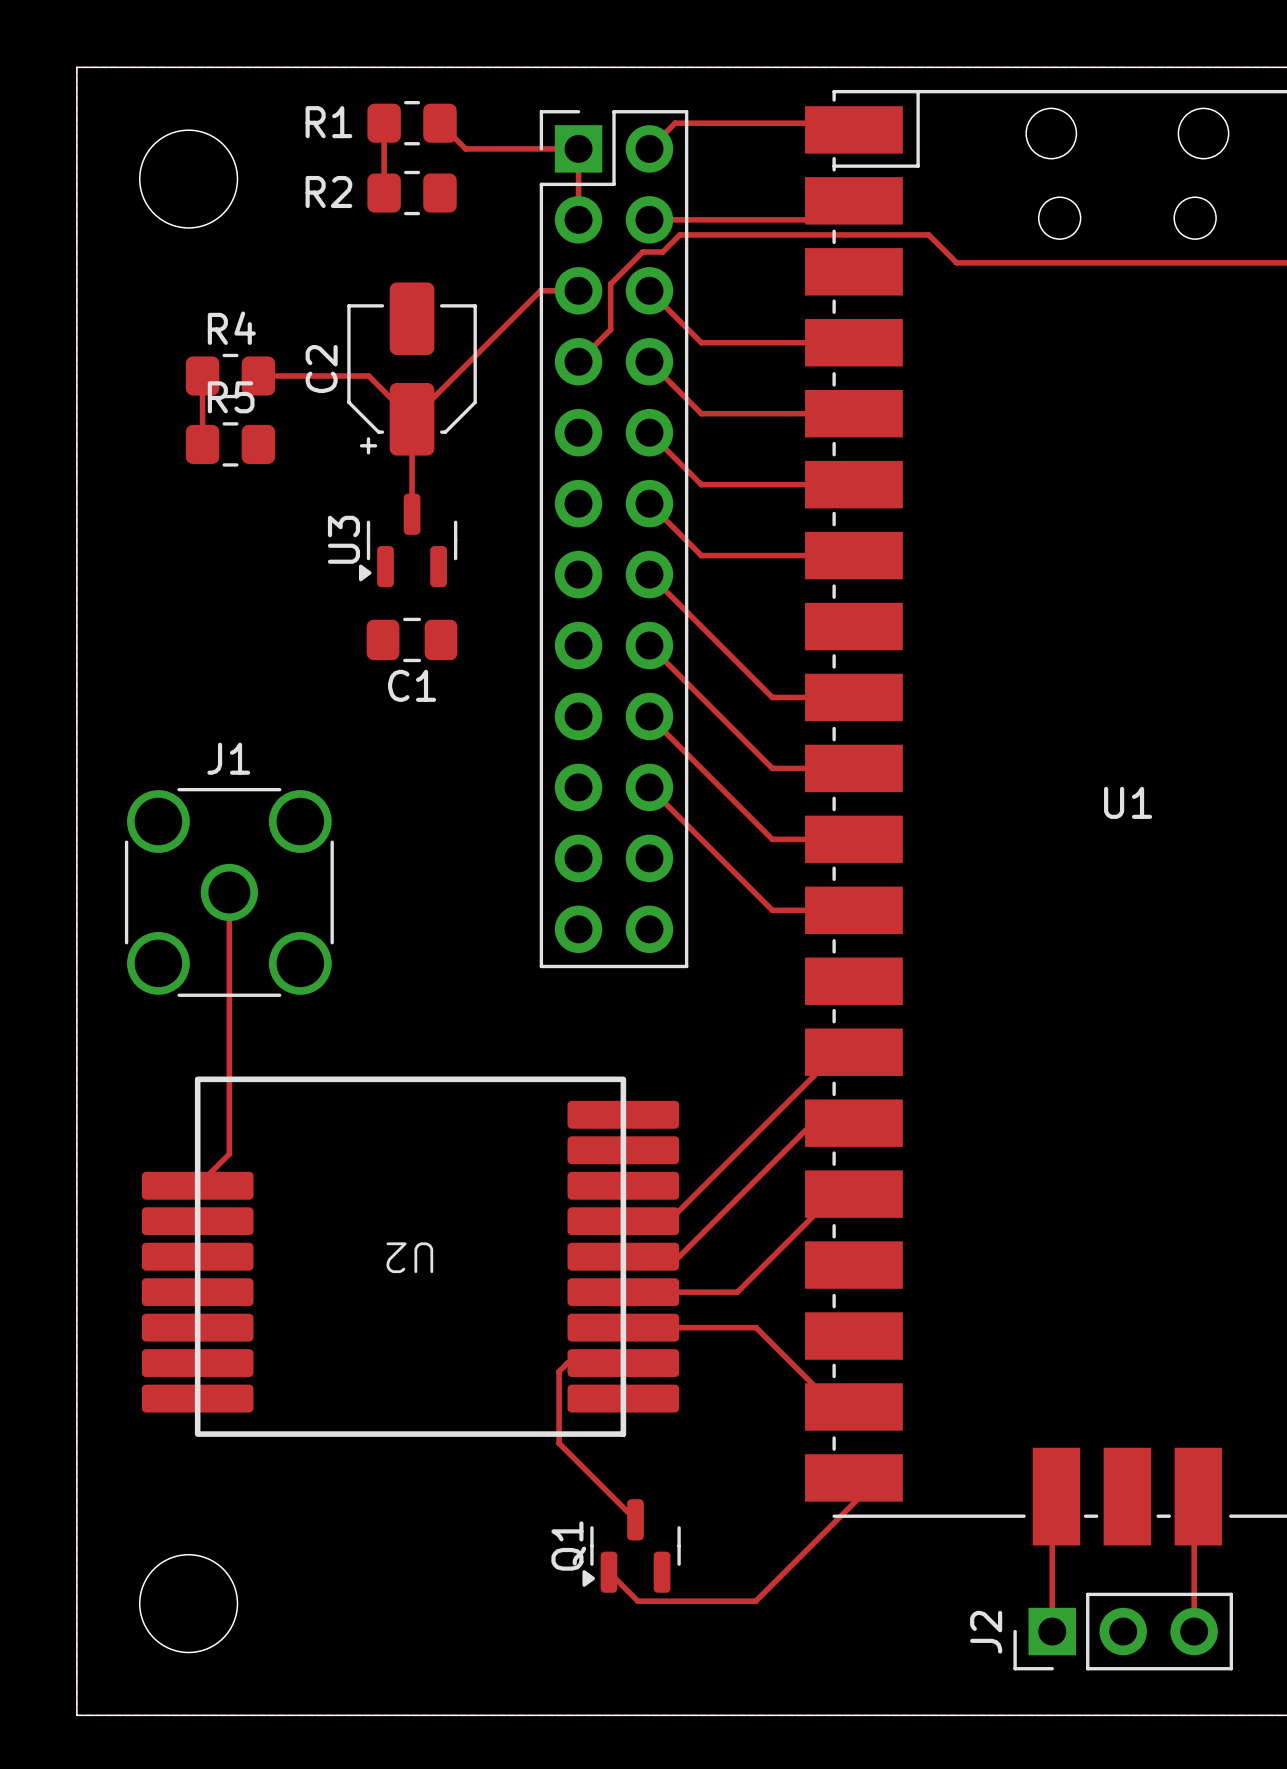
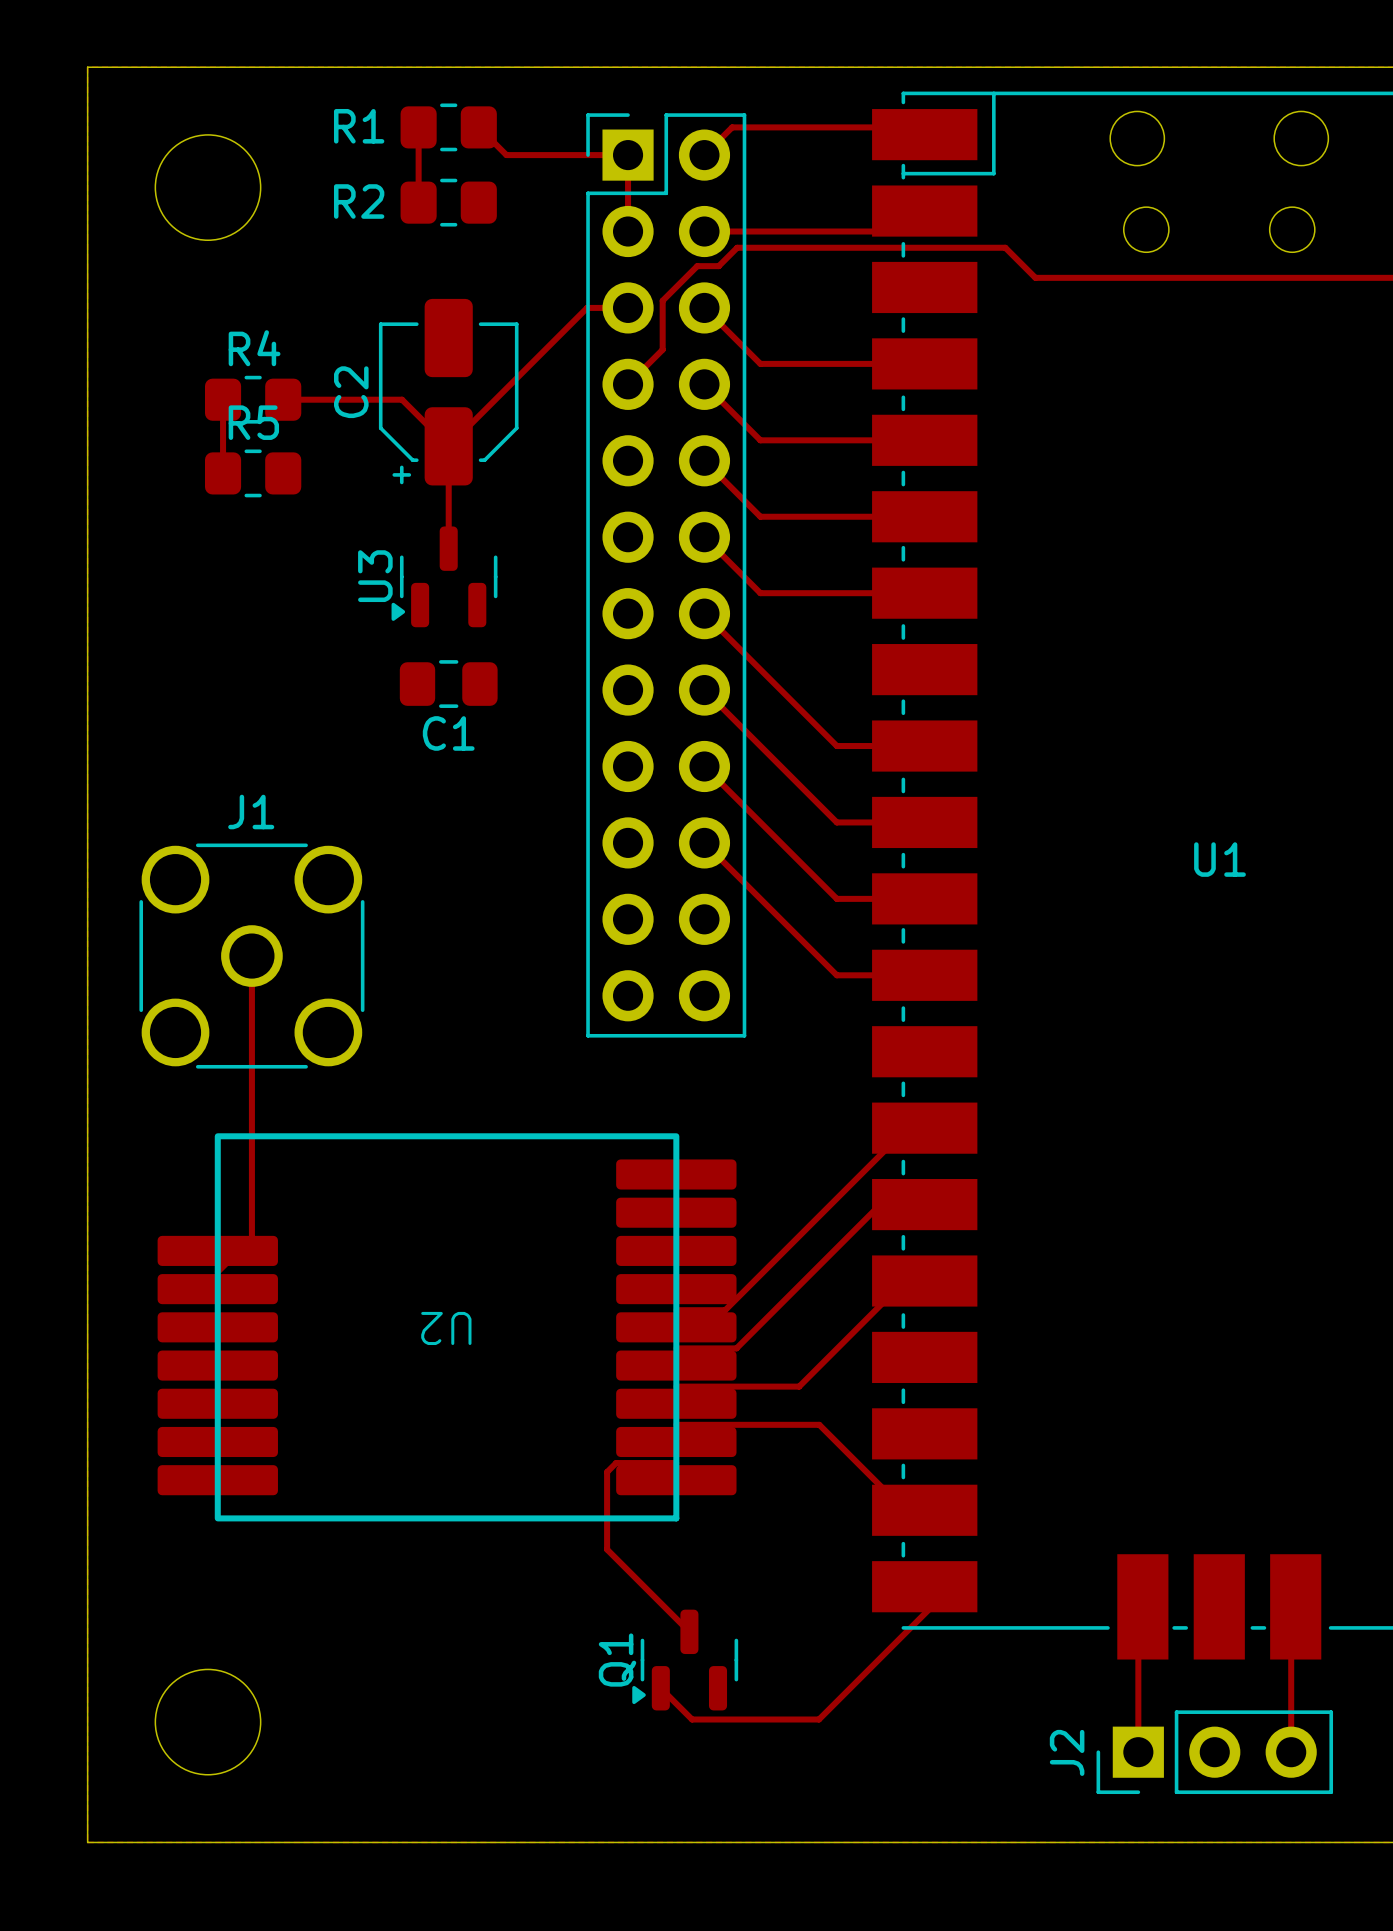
U2 position: (410, 1256) -> (447, 1327)

